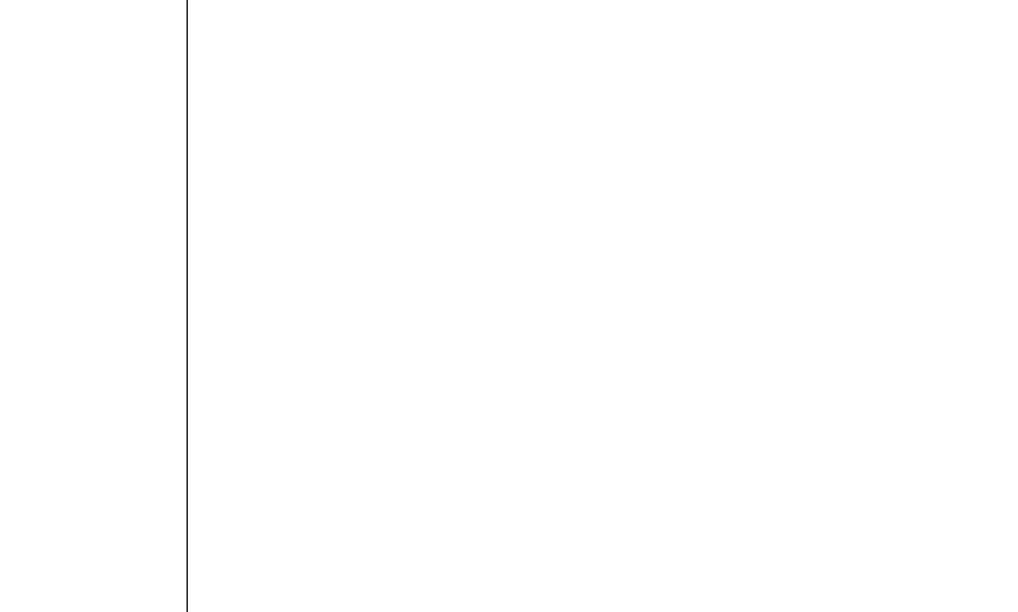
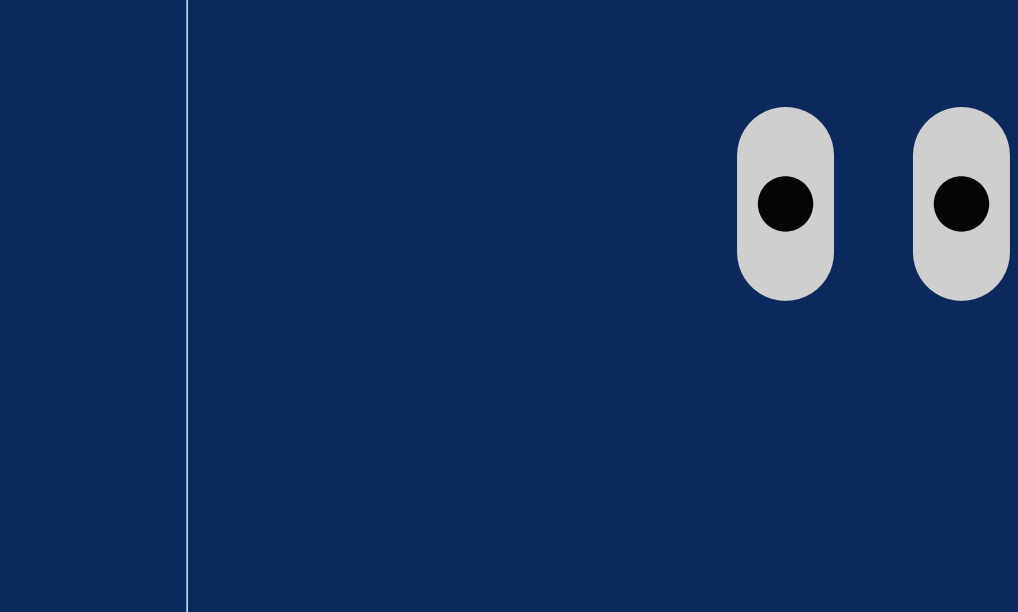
part: none -> (873, 203)

